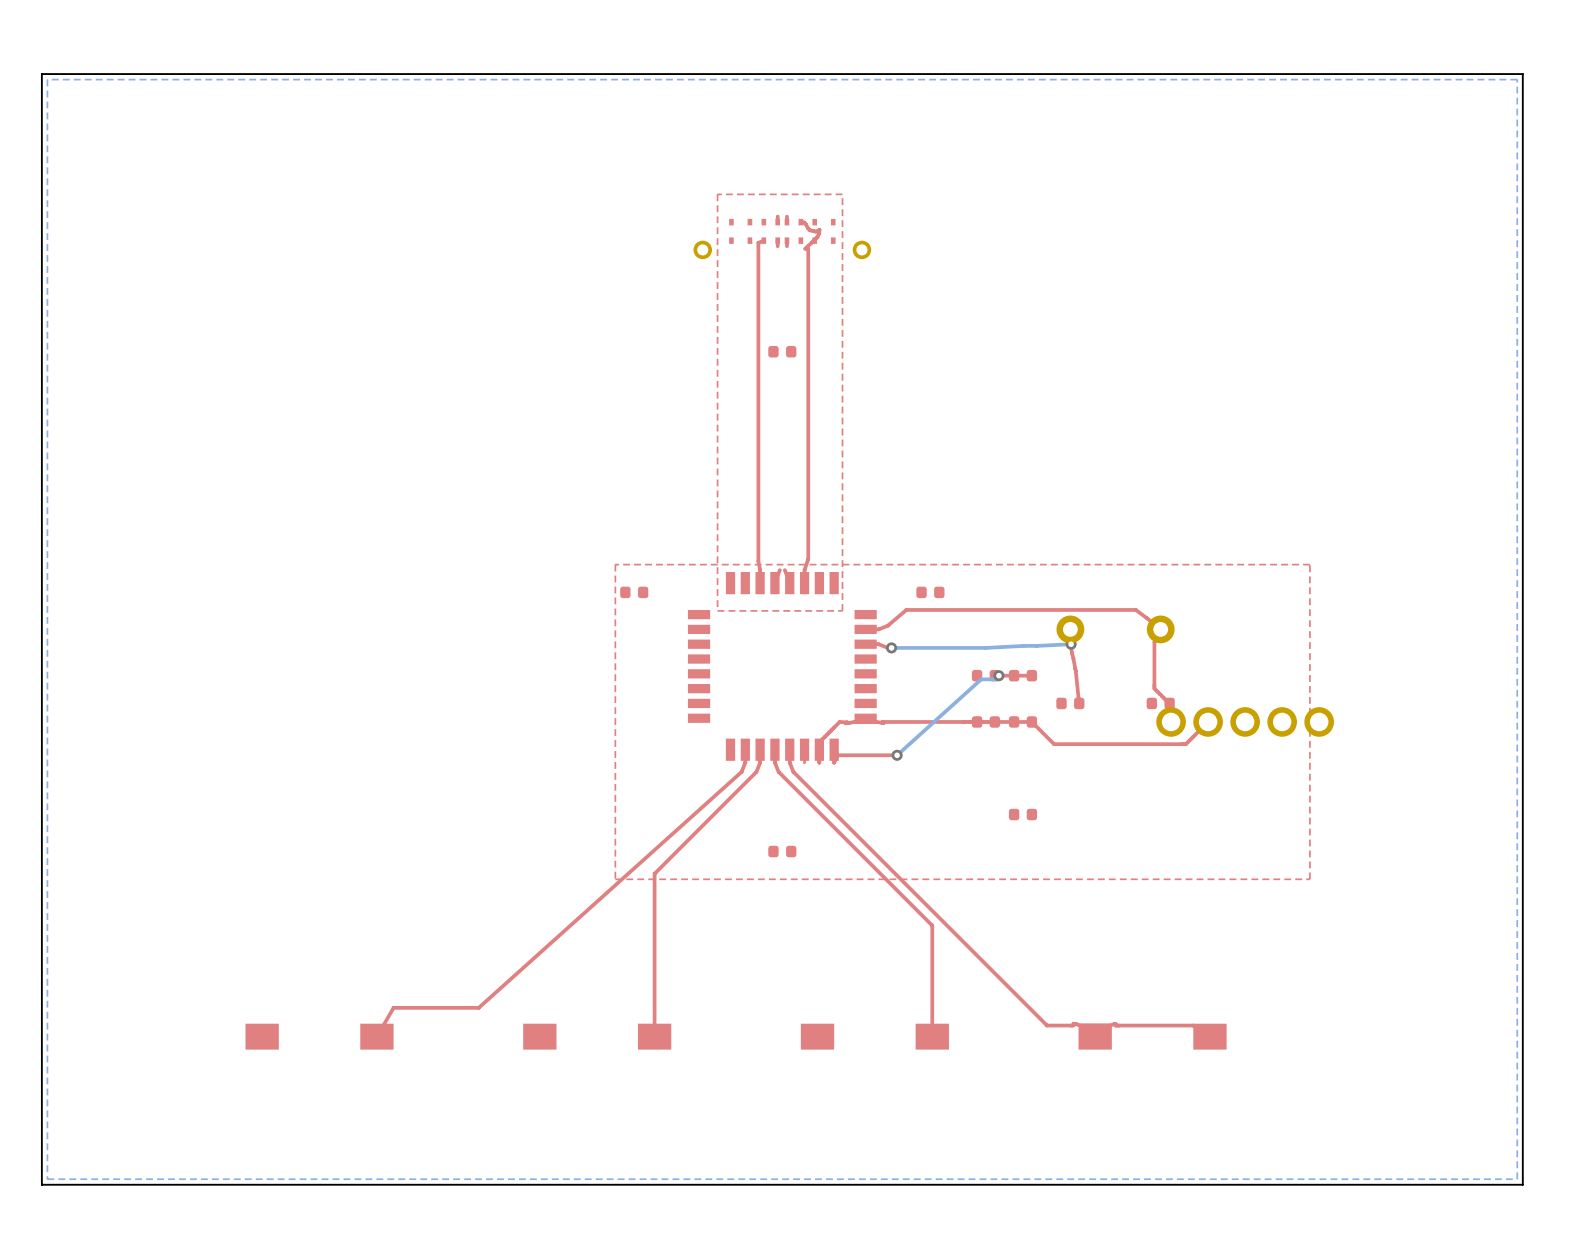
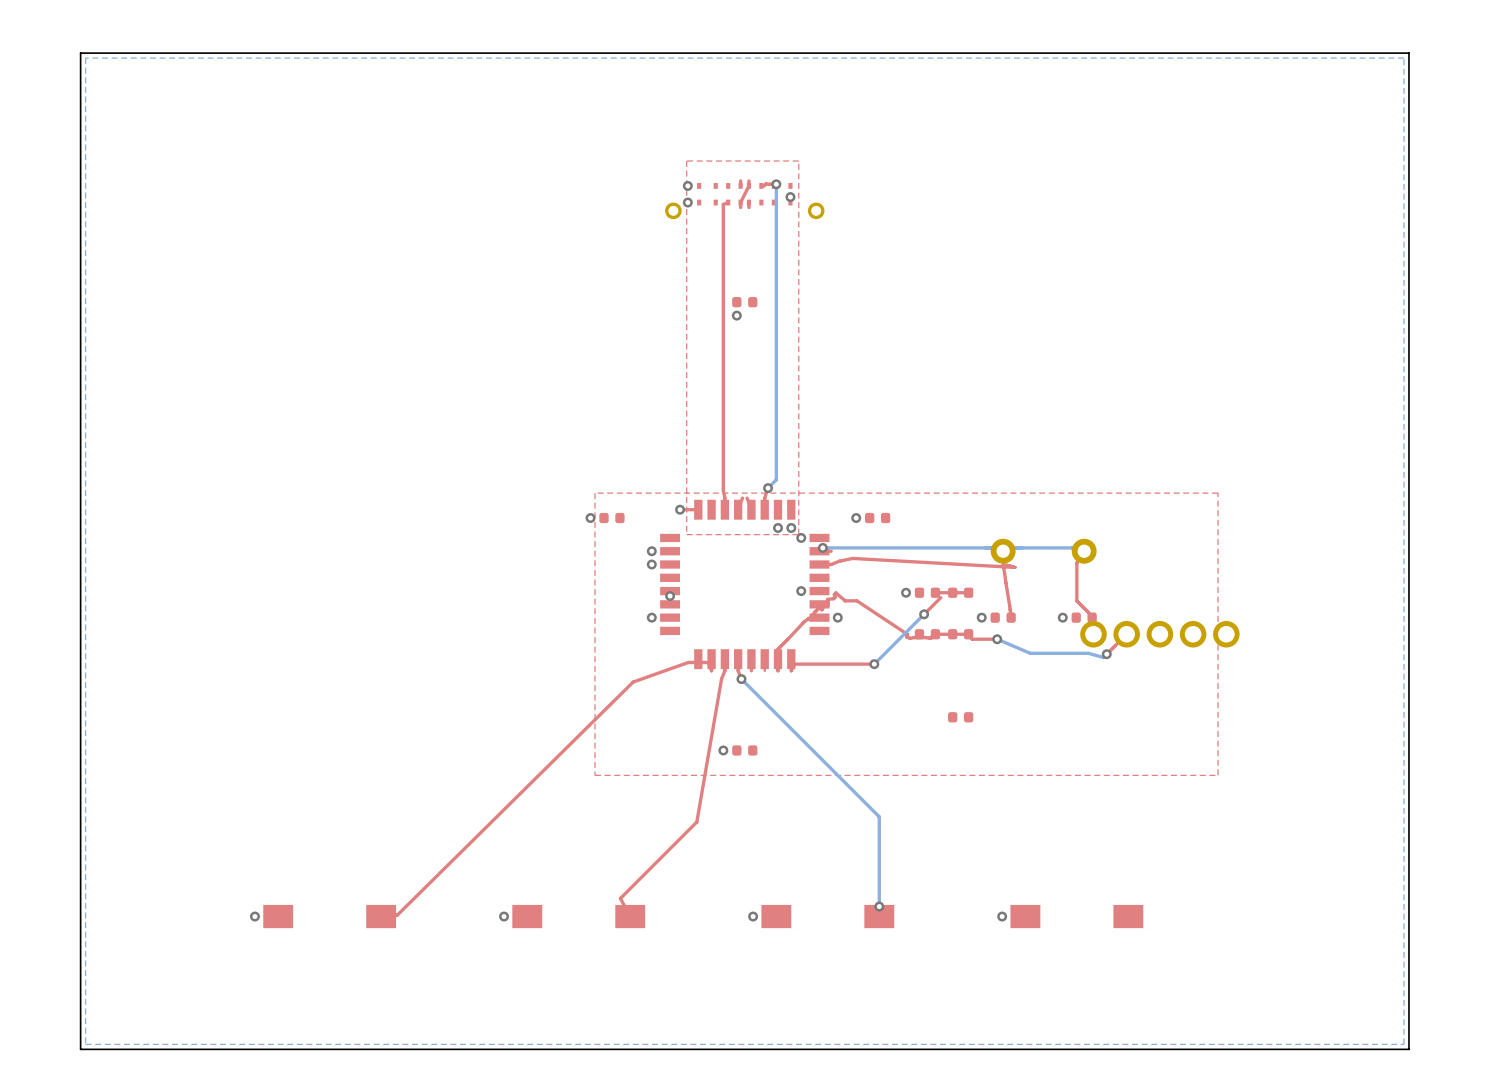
bottom track: none -> (776, 184) (776, 479) (768, 488)
via: none -> (776, 184)
via: none -> (687, 185)
top track: none -> (748, 185) (740, 202)
top track: (800, 222) (804, 222) (809, 230) (816, 231) (819, 229) (817, 236) (805, 248) (808, 249) (808, 559) -> (761, 185) (776, 184)
via: none -> (790, 197)
via: none -> (687, 202)
via: none -> (736, 315)
via: none -> (768, 488)
via: none -> (680, 509)
top track: none -> (698, 509) (680, 509)
via: none -> (590, 518)
via: none -> (856, 518)
via: none -> (778, 527)
via: none -> (791, 527)
via: none -> (801, 537)
bottom track: none -> (822, 547) (1071, 547) (1084, 551)
via: none -> (822, 547)
via: none -> (651, 551)
top track: (878, 629) (887, 625) (906, 609) (1135, 609) (1160, 629) (1154, 642) (1154, 688) (1169, 703) -> (1084, 551) (1076, 562) (1076, 601) (1092, 617)
via: none -> (651, 564)
top track: (878, 644) (891, 647) -> none
top track: (1071, 644) (1079, 703) -> (831, 564) (852, 558) (1014, 567) (1003, 564) (1004, 573) (1005, 583) (1009, 605) (1011, 617)
bottom track: (1071, 644) (985, 647) (891, 647) -> none
via: (1071, 644) -> none
via: (891, 647) -> none
via: none -> (801, 591)
via: none -> (906, 592)
bottom track: (998, 675) (994, 679) (981, 679) (897, 755) -> none
via: (998, 675) -> none
via: none -> (670, 596)
top track: none -> (940, 597) (924, 614)
bottom track: none -> (924, 614) (874, 664)
via: none -> (924, 614)
via: none -> (651, 617)
via: none -> (837, 617)
via: none -> (981, 617)
via: none -> (1062, 617)
top track: (994, 721) (839, 721) (819, 742) -> (935, 634) (930, 638) (909, 638) (906, 636) (907, 634) (856, 600) (845, 600) (836, 593) (833, 598) (827, 599) (828, 604) (824, 605) (821, 609) (819, 607) (804, 621) (778, 649) (778, 652)
top track: (1031, 721) (1054, 744) (1185, 744) -> (968, 634) (972, 639) (997, 639)
bottom track: none -> (997, 639) (1030, 653) (1088, 653) (1103, 657) (1106, 654)
via: none -> (997, 639)
via: none -> (1106, 654)
via: (897, 755) -> none
top track: none -> (874, 664) (847, 664)
via: none -> (874, 664)
top track: (745, 762) (741, 771) (478, 1007) (393, 1007) (376, 1036) -> (711, 670) (708, 662) (688, 662) (633, 682) (397, 915) (377, 907) (381, 916)
top track: (789, 762) (793, 771) (1047, 1025) (1072, 1025) (1073, 1023) (1080, 1025) (1193, 1025) (1209, 1036) -> none
top track: (756, 771) (654, 873) (654, 1036) -> (721, 679) (696, 822) (620, 898) (630, 916)
top track: (778, 771) (932, 925) (932, 1025) -> none
bottom track: none -> (741, 679) (879, 816) (879, 906)
via: none -> (741, 679)
via: none -> (723, 750)
via: none -> (879, 906)
via: none -> (254, 916)
via: none -> (504, 916)
via: none -> (753, 916)
via: none -> (1002, 916)

